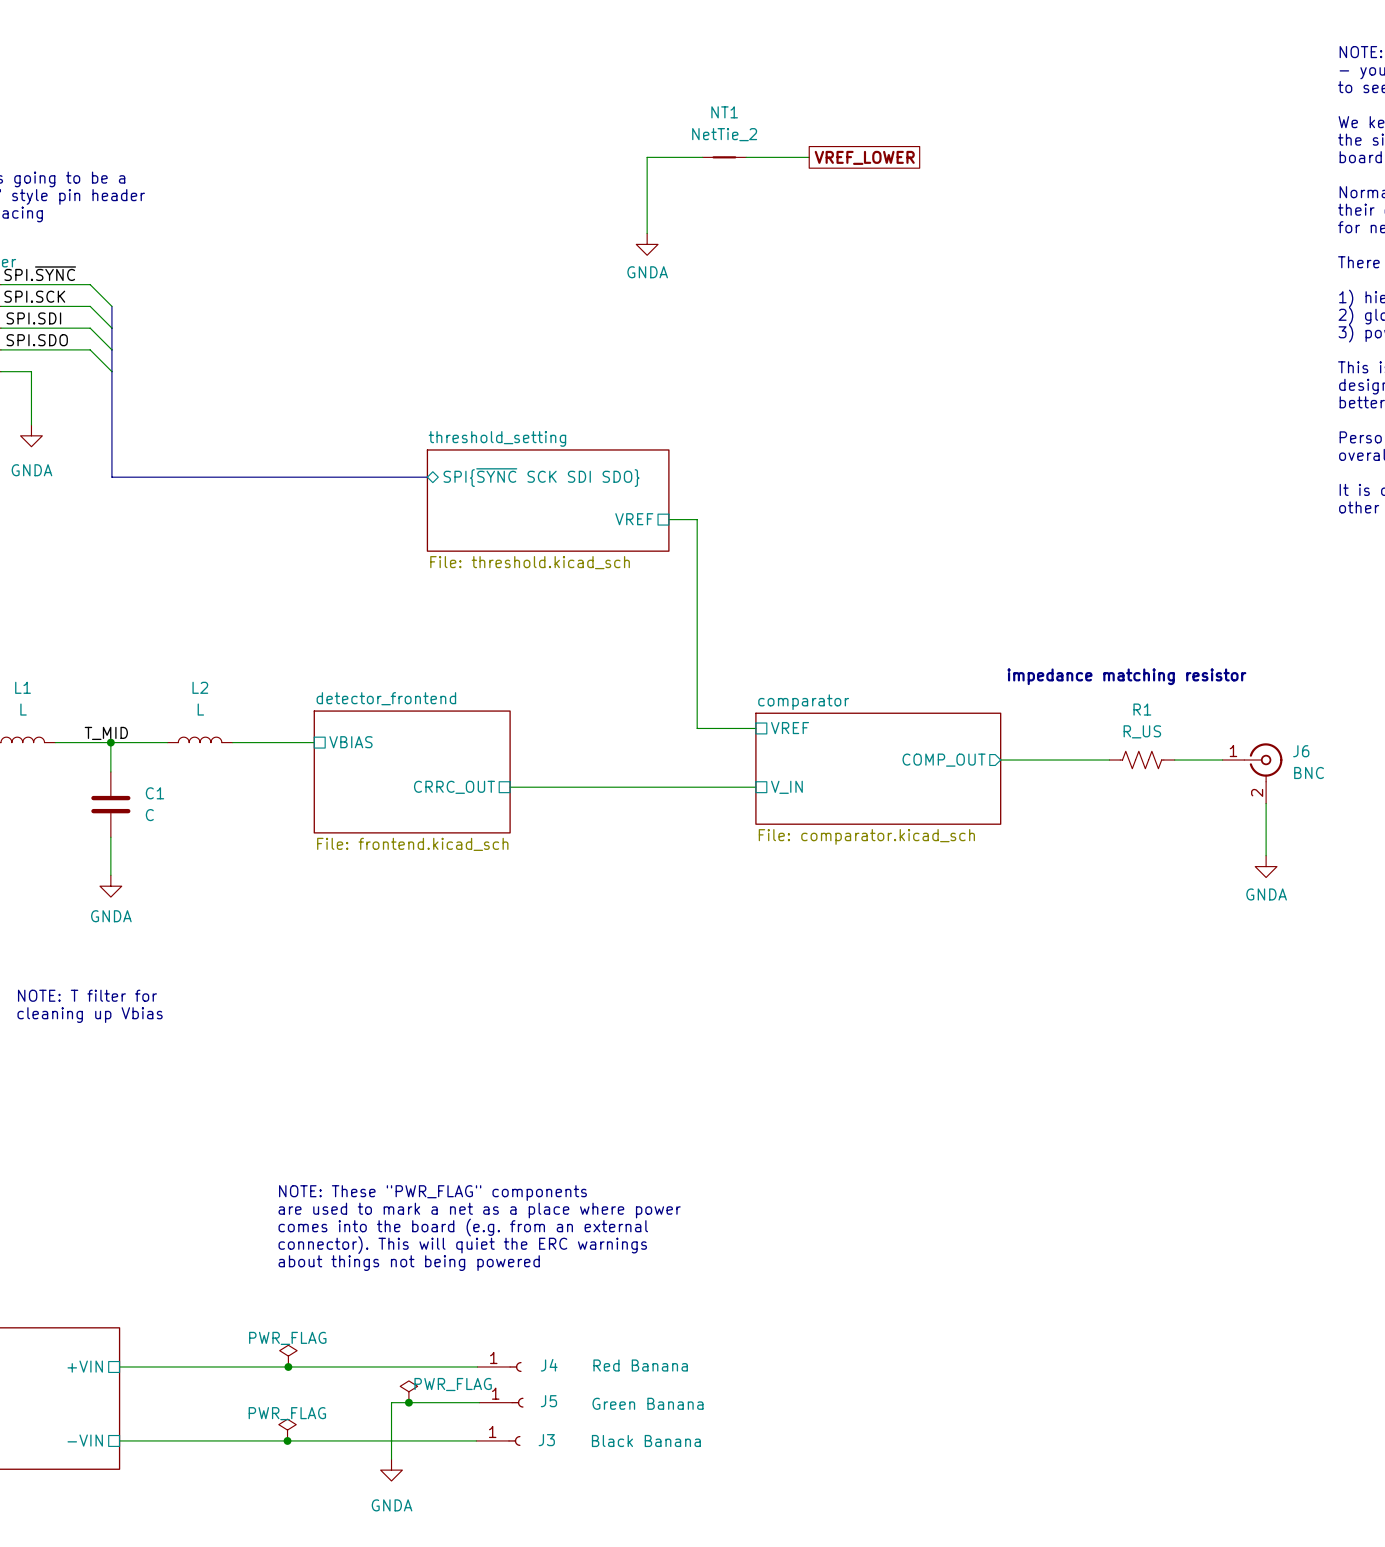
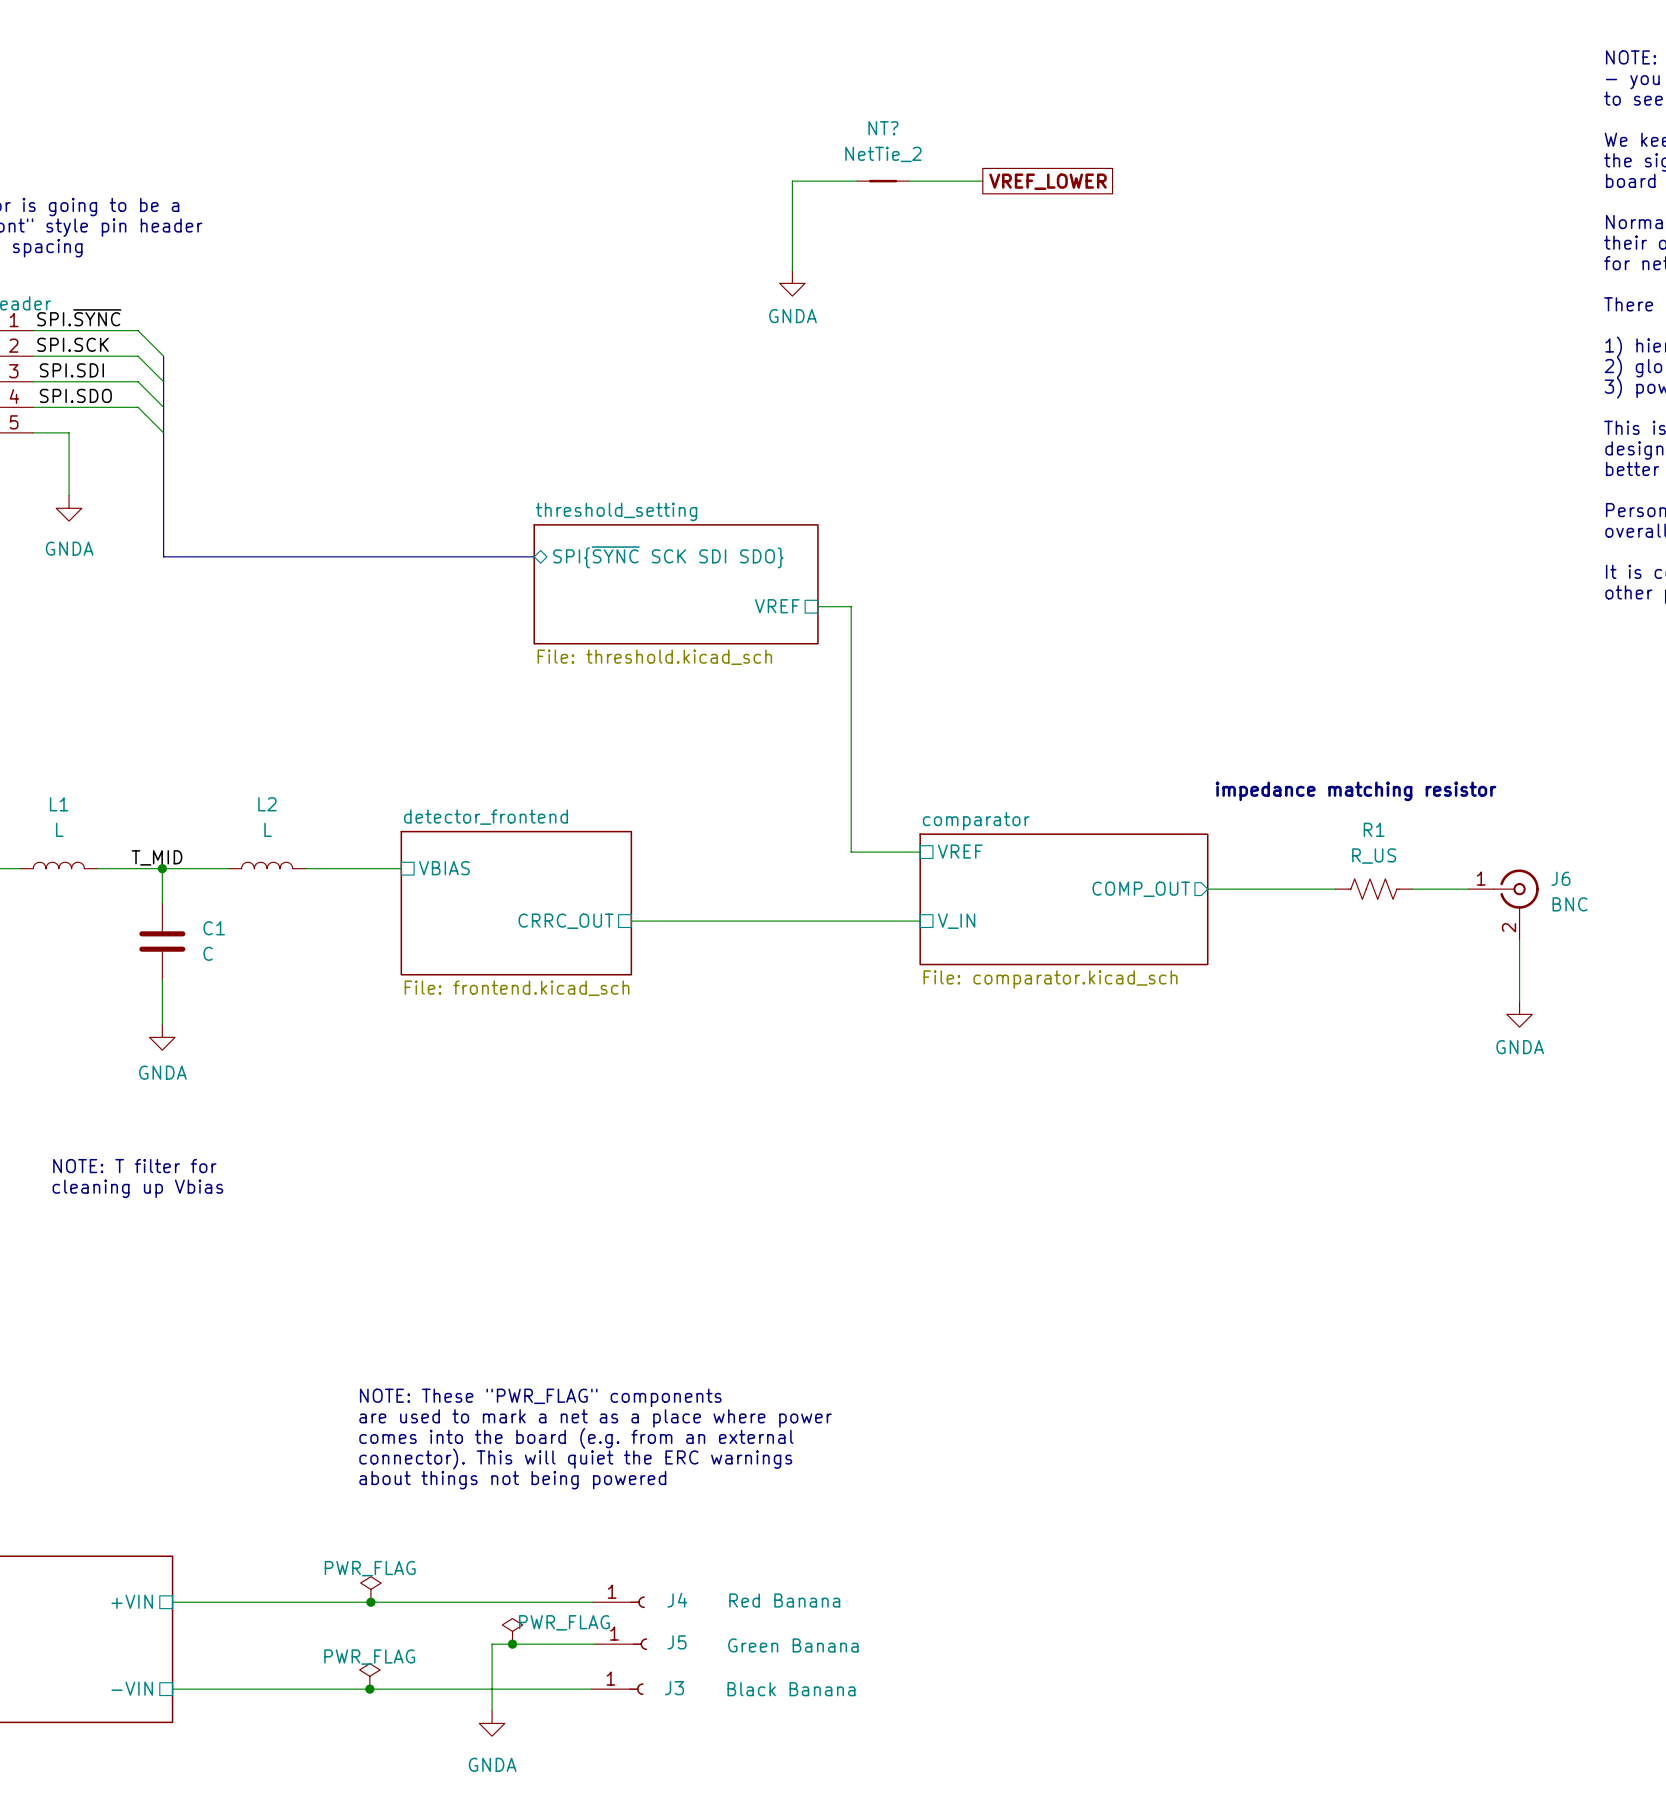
NT1 name: NT1 (724, 112) -> NT? (883, 128)

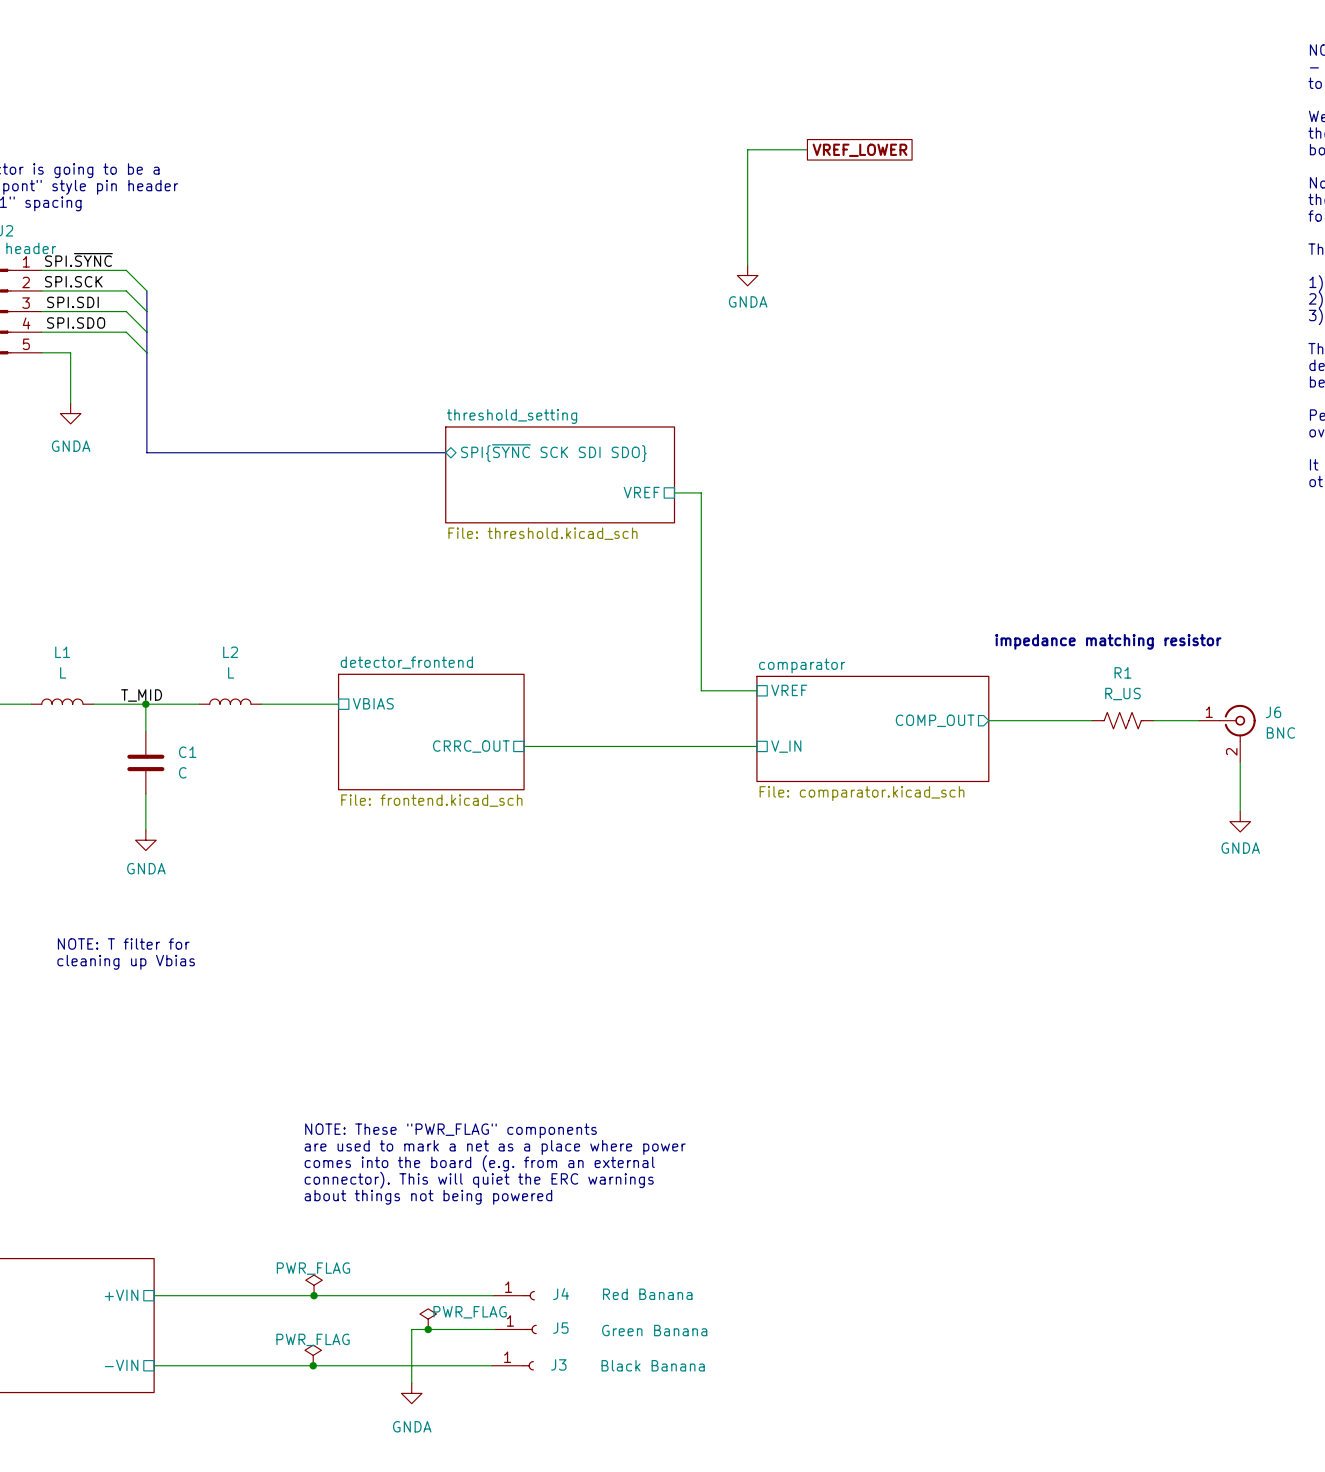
wire: (857, 181) (792, 181) (792, 270) -> none
NT?: NetTie_2 (883, 181) -> none
wire: none -> (747, 149) (747, 265)
power symbol position: GNDA (792, 283) -> GNDA (747, 275)

